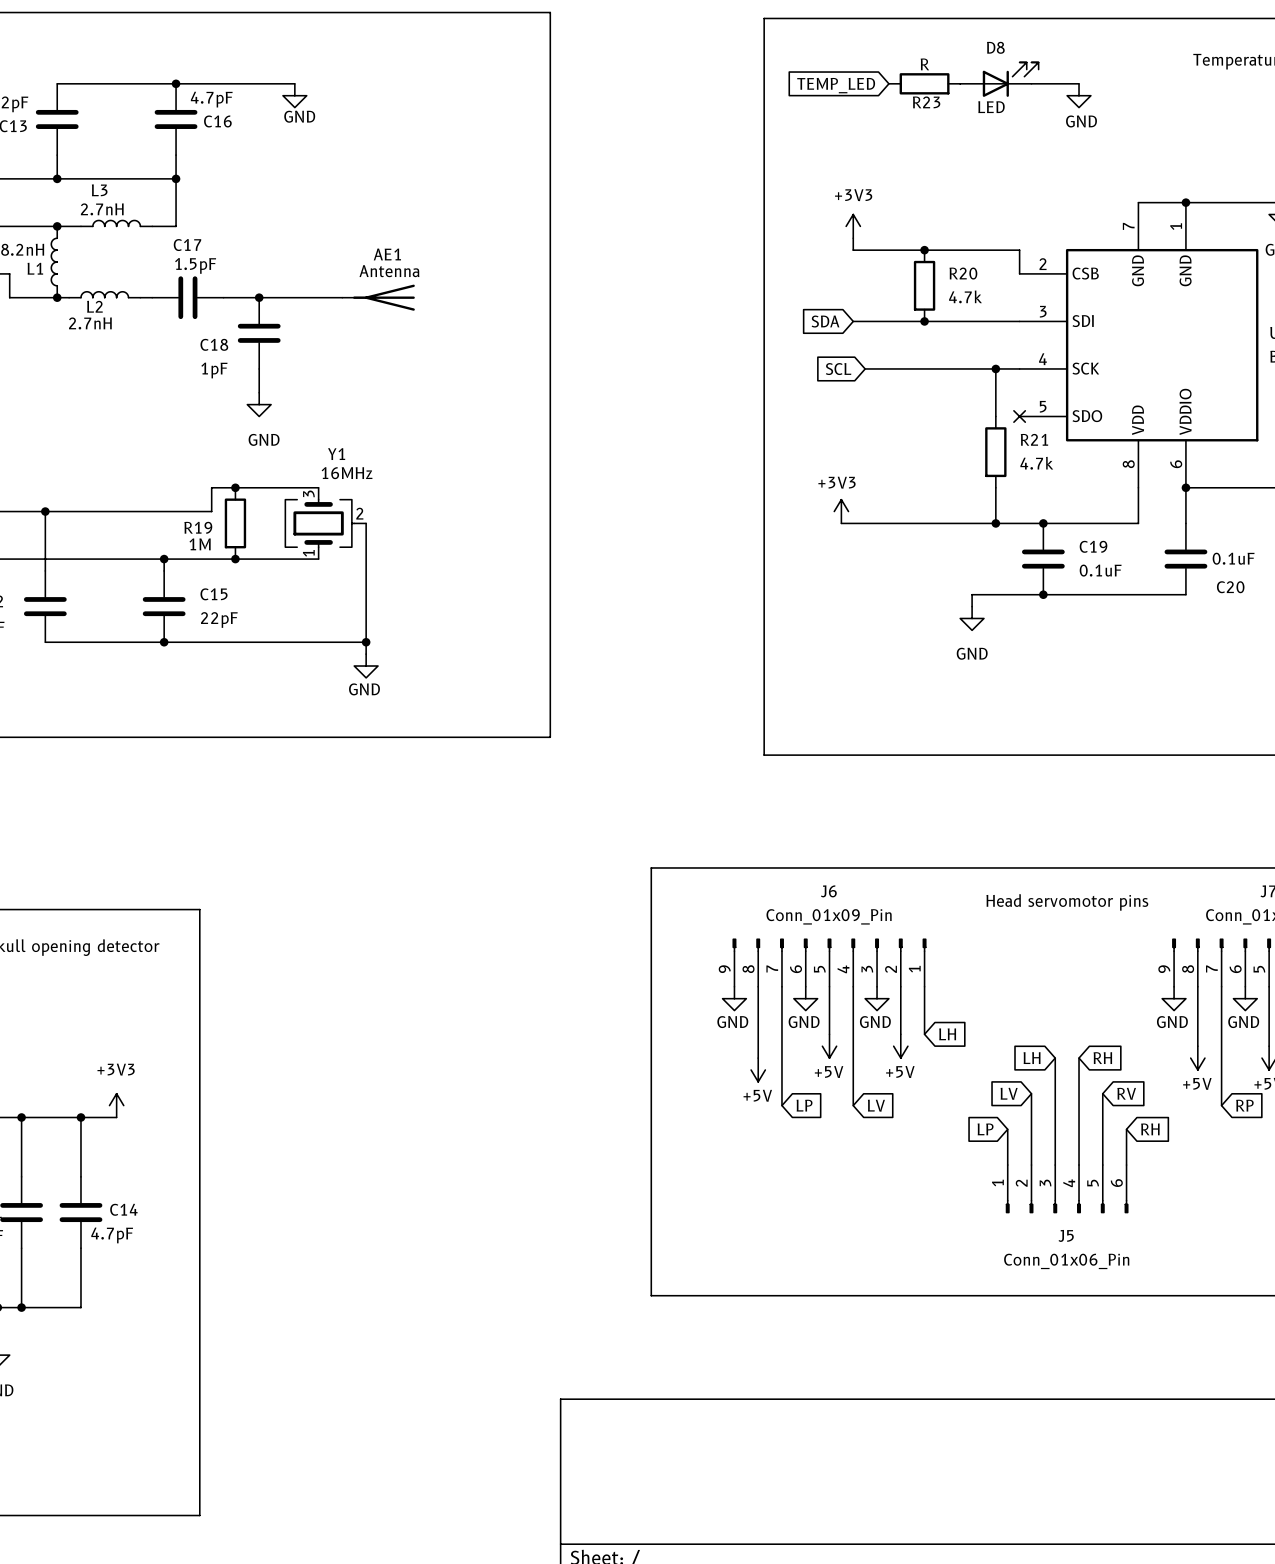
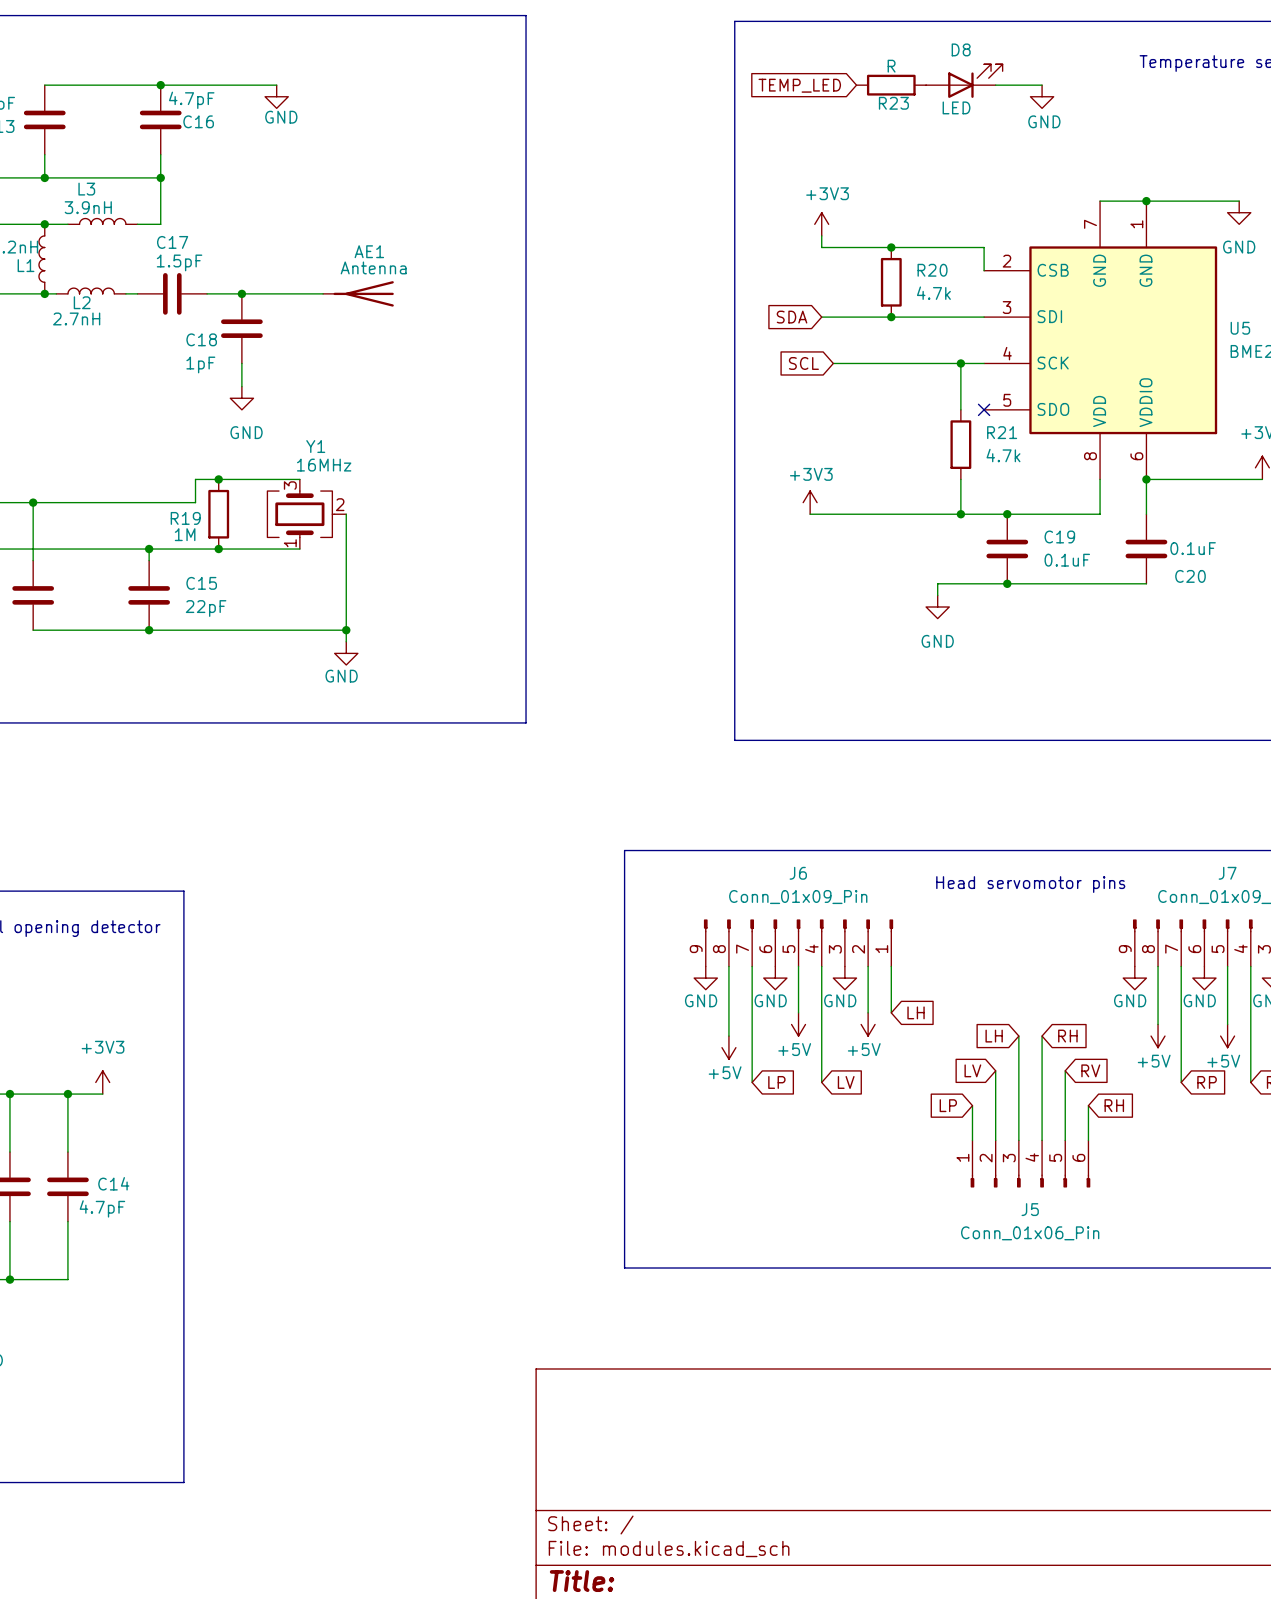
L3 value: 2.7nH (102, 209) -> 3.9nH (88, 207)

